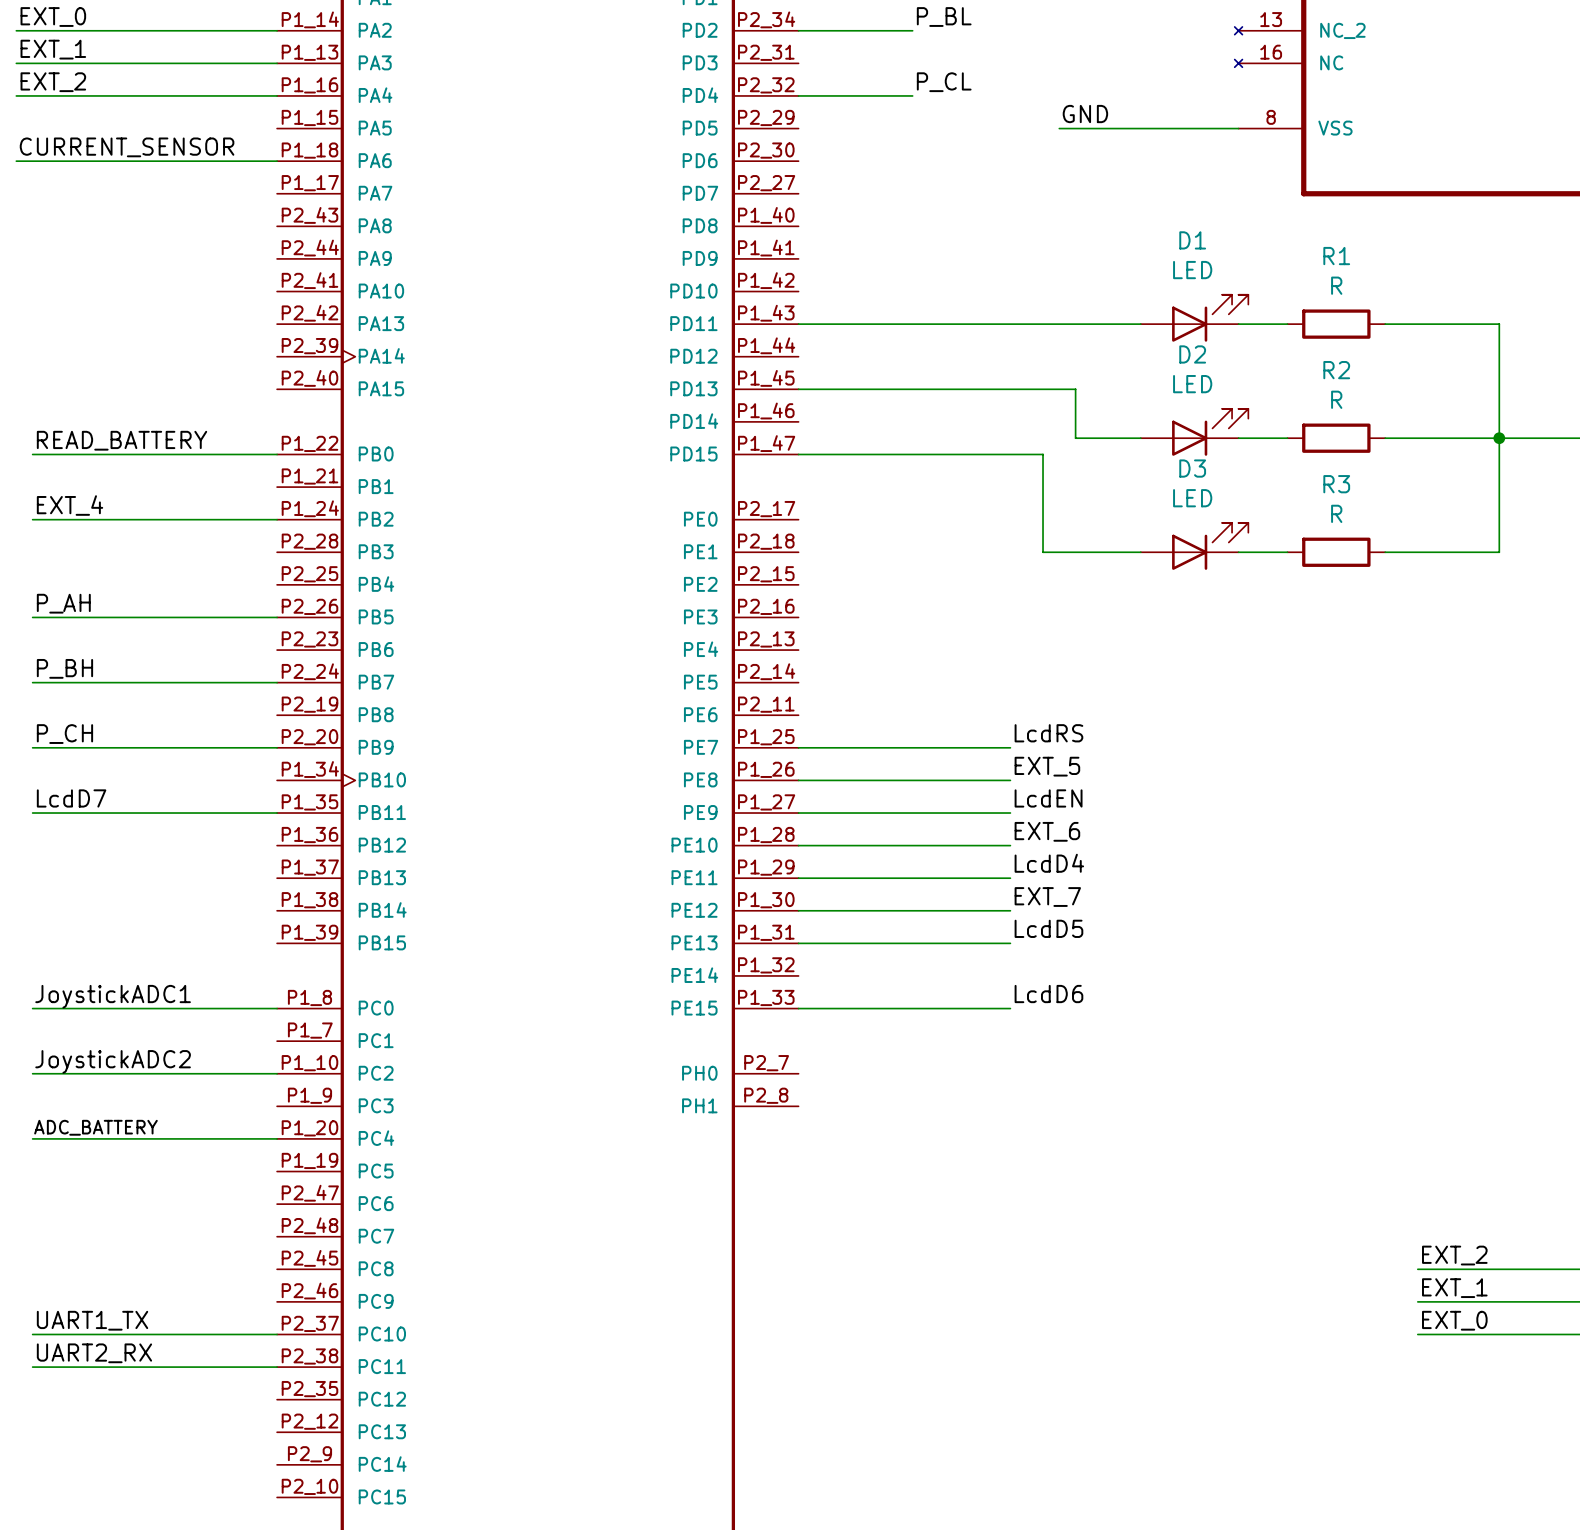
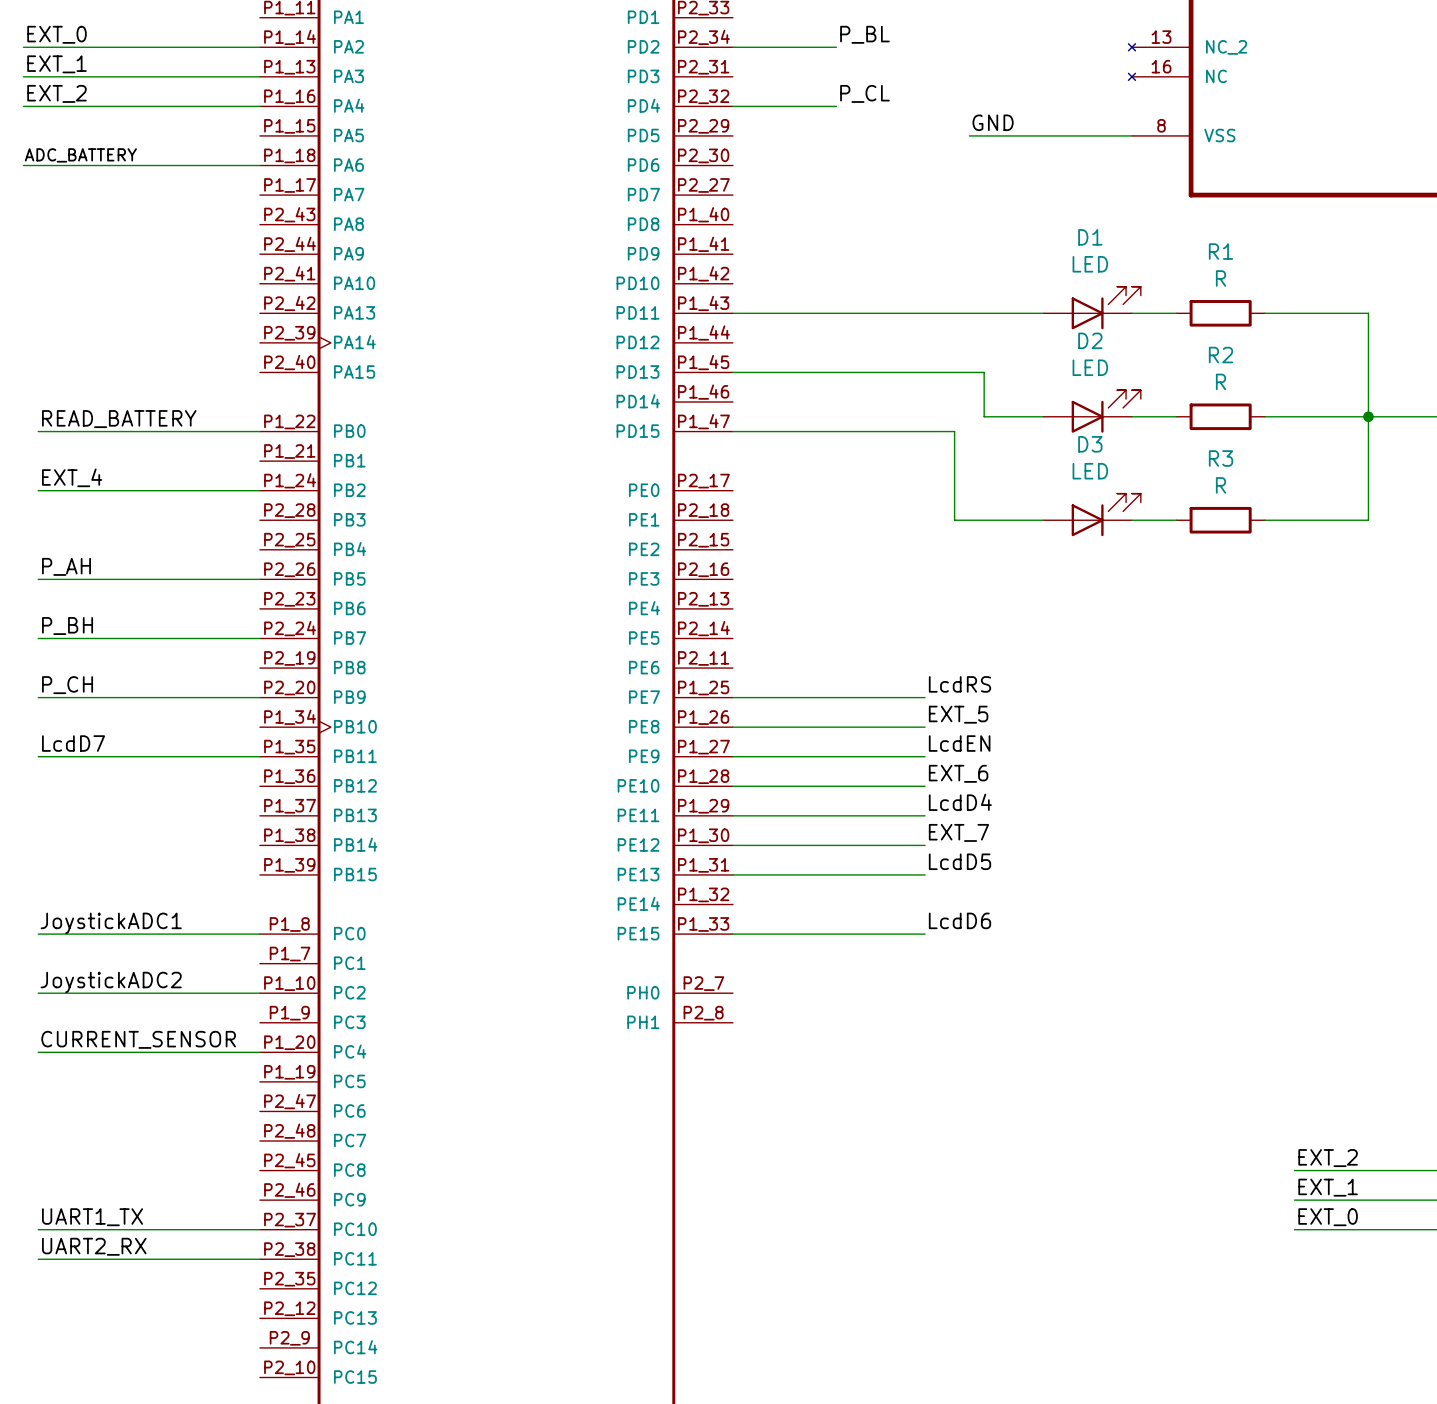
label: CURRENT_SENSOR (127, 147) -> ADC_BATTERY (80, 155)
label: ADC_BATTERY (95, 1127) -> CURRENT_SENSOR (138, 1039)

